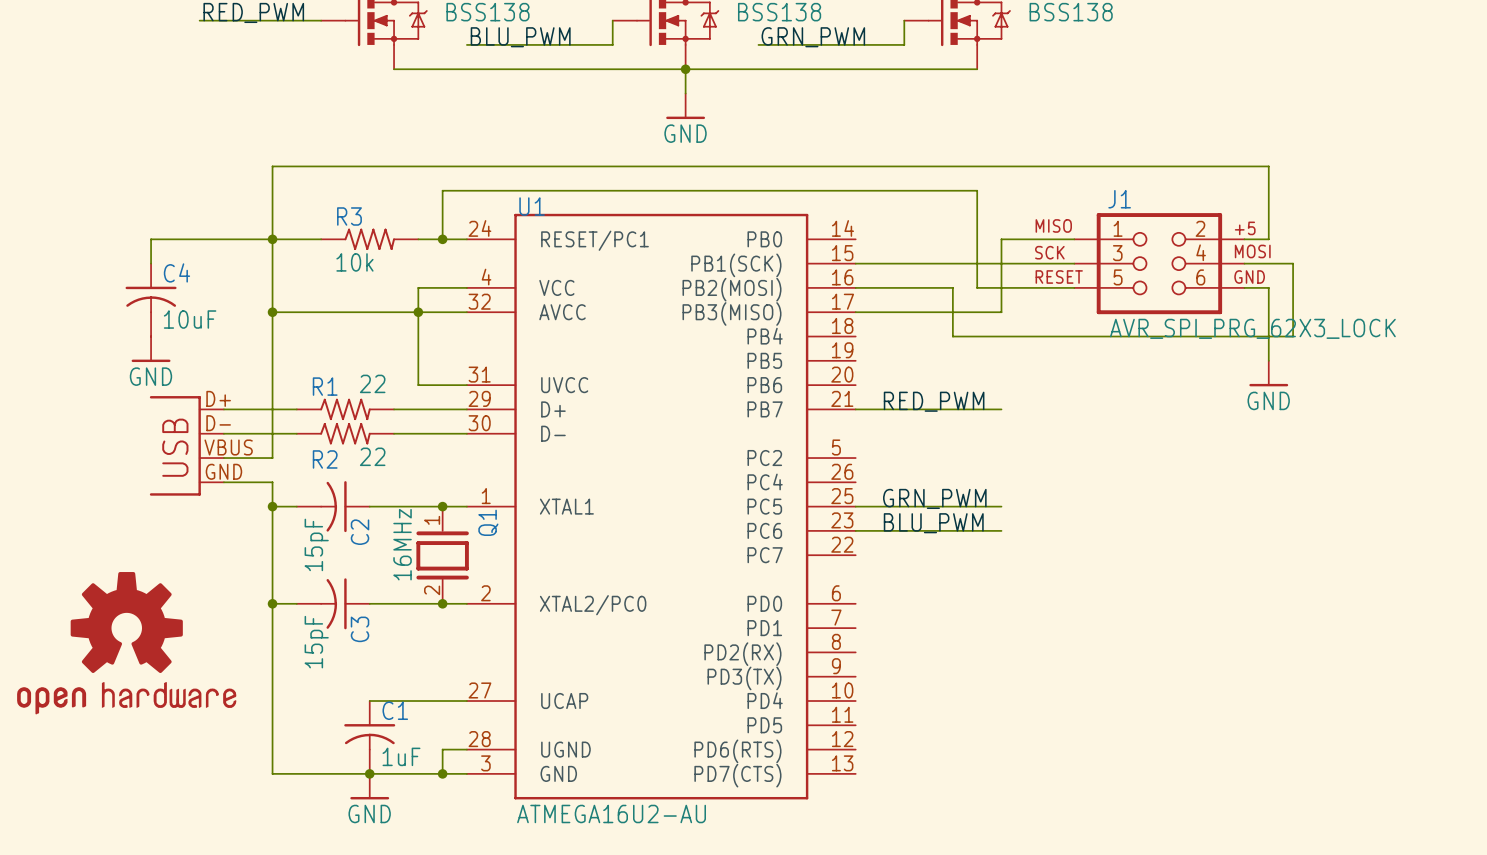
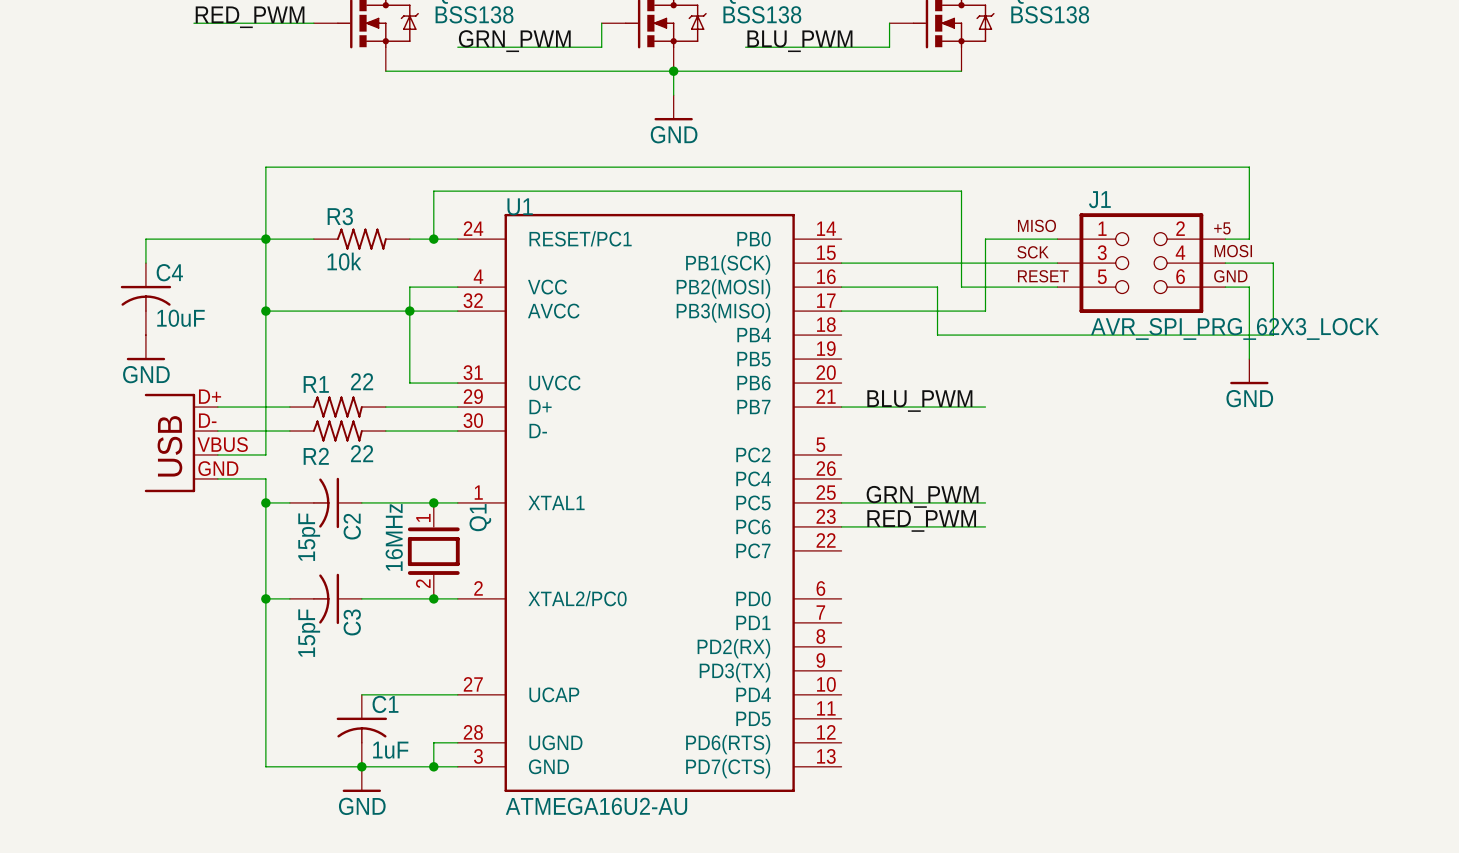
label: BLU_PWM (520, 37) -> GRN_PWM (514, 41)
label: GRN_PWM (813, 37) -> BLU_PWM (799, 41)
label: RED_PWM (934, 401) -> BLU_PWM (919, 401)
label: BLU_PWM (933, 523) -> RED_PWM (921, 520)
part: (126, 643) -> none

